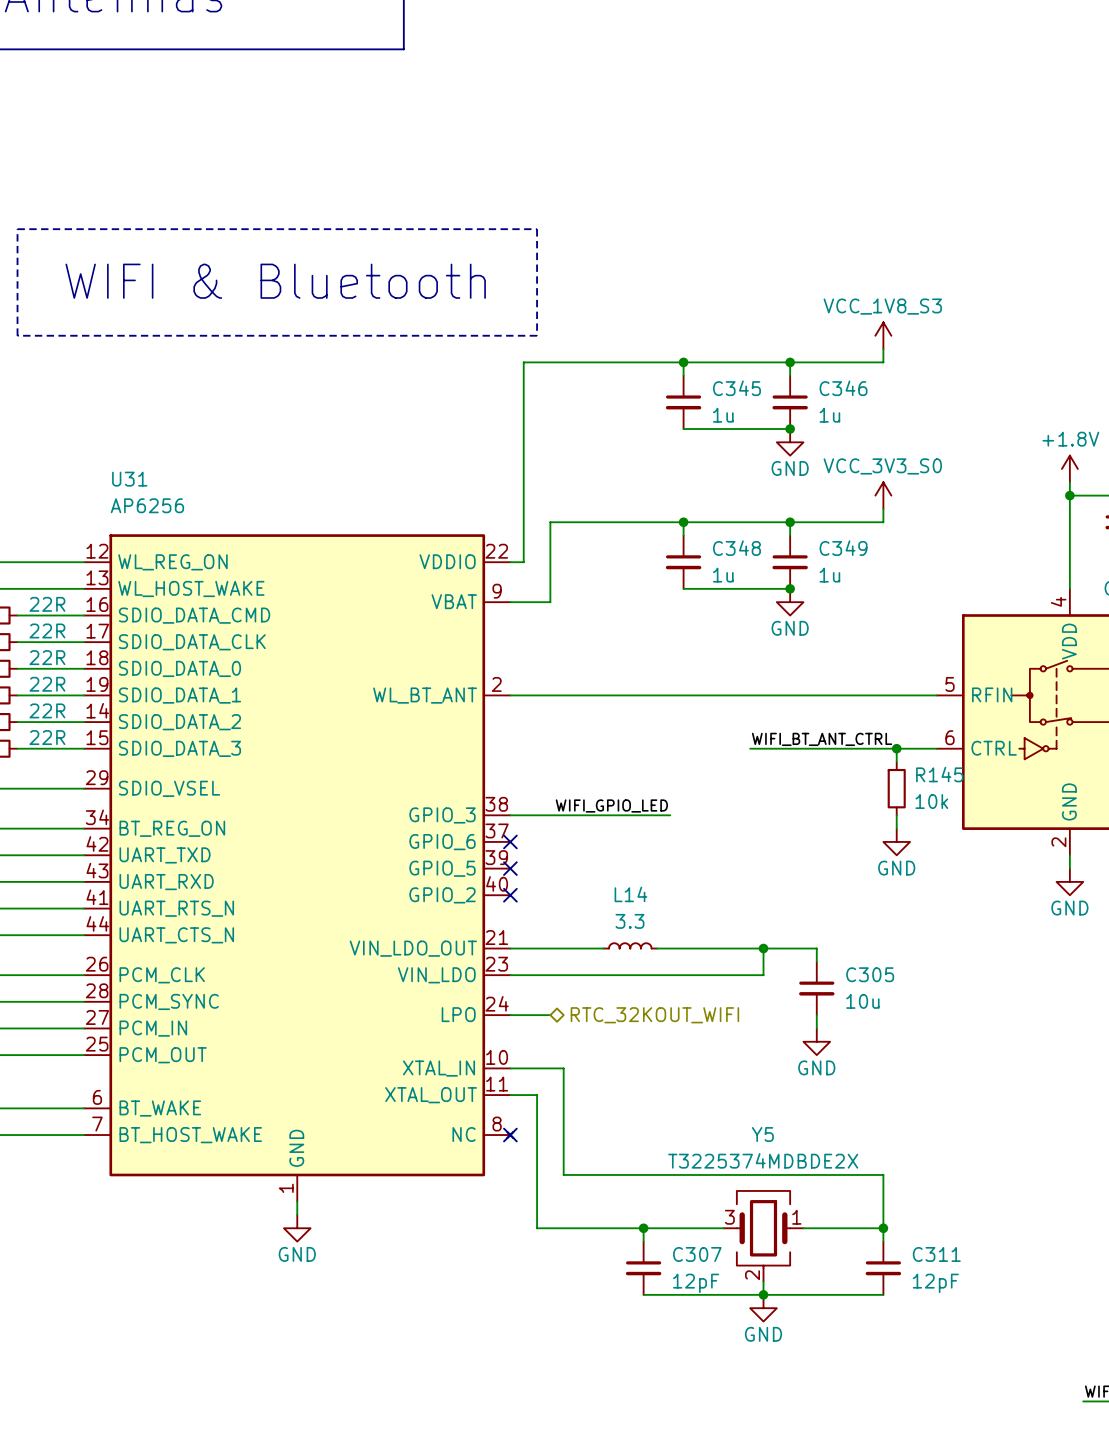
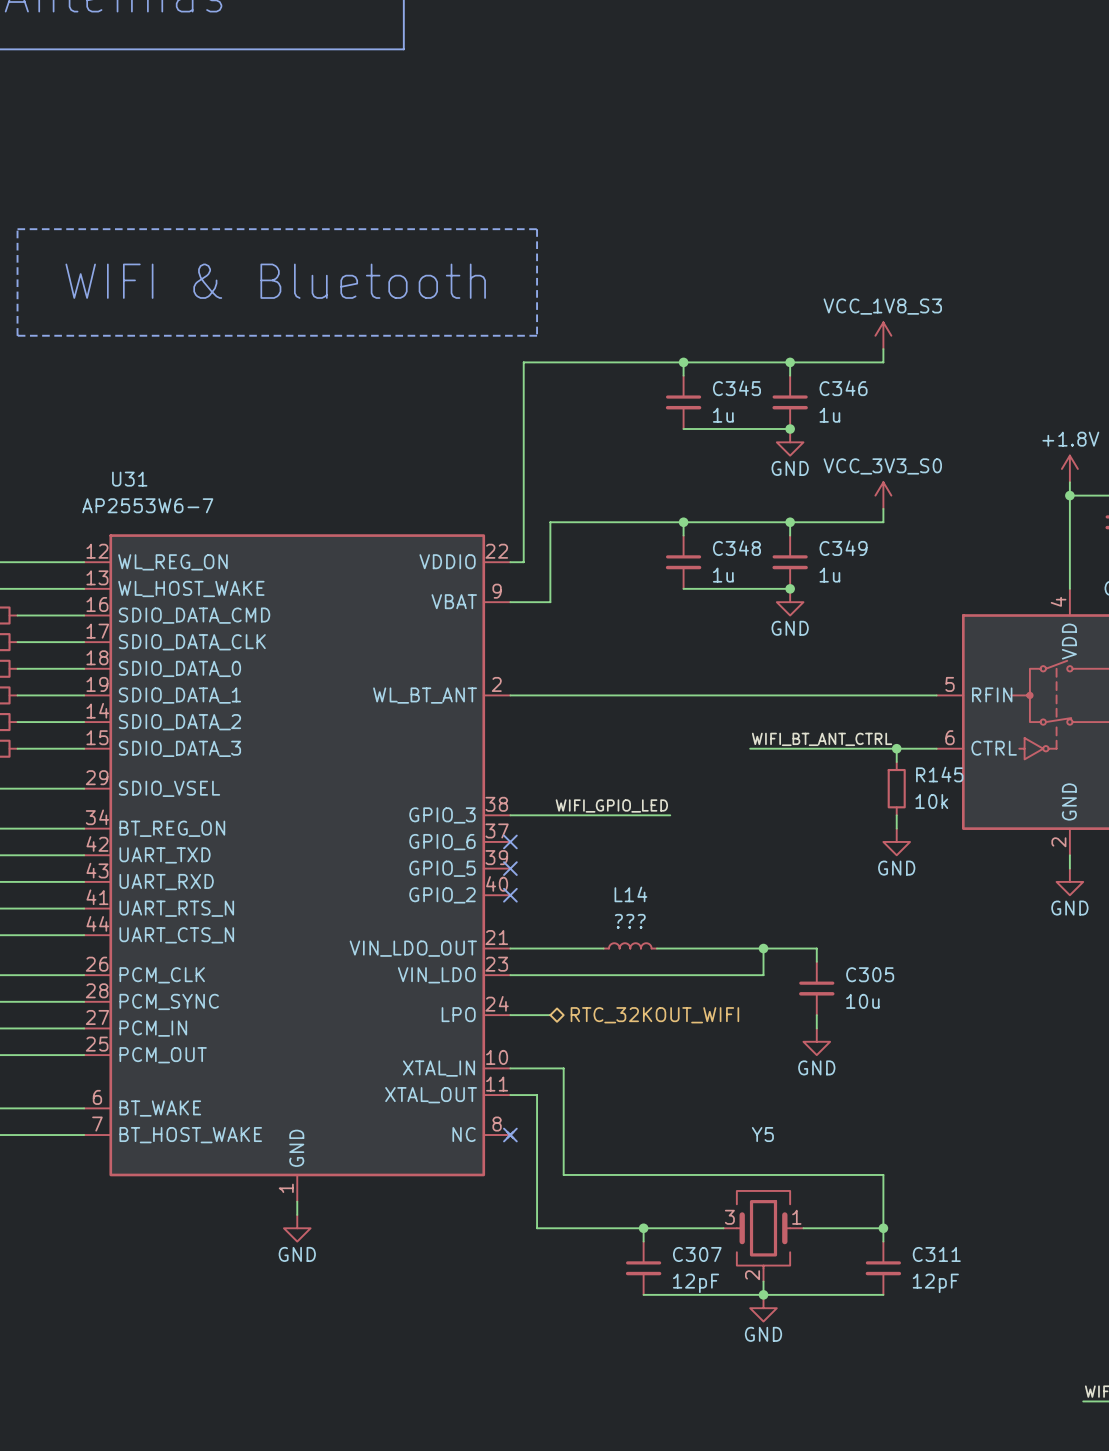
U31 value: AP6256 (147, 505) -> AP2553W6-7 (147, 505)
part value: 22R (47, 604) -> none
part value: 22R (47, 630) -> none
part value: 22R (47, 657) -> none
part value: 22R (47, 684) -> none
part value: 22R (47, 710) -> none
part value: 22R (47, 737) -> none
L14 value: 3.3 (629, 921) -> ??? (630, 921)
Y5 value: T3225374MDBDE2X (763, 1160) -> none

